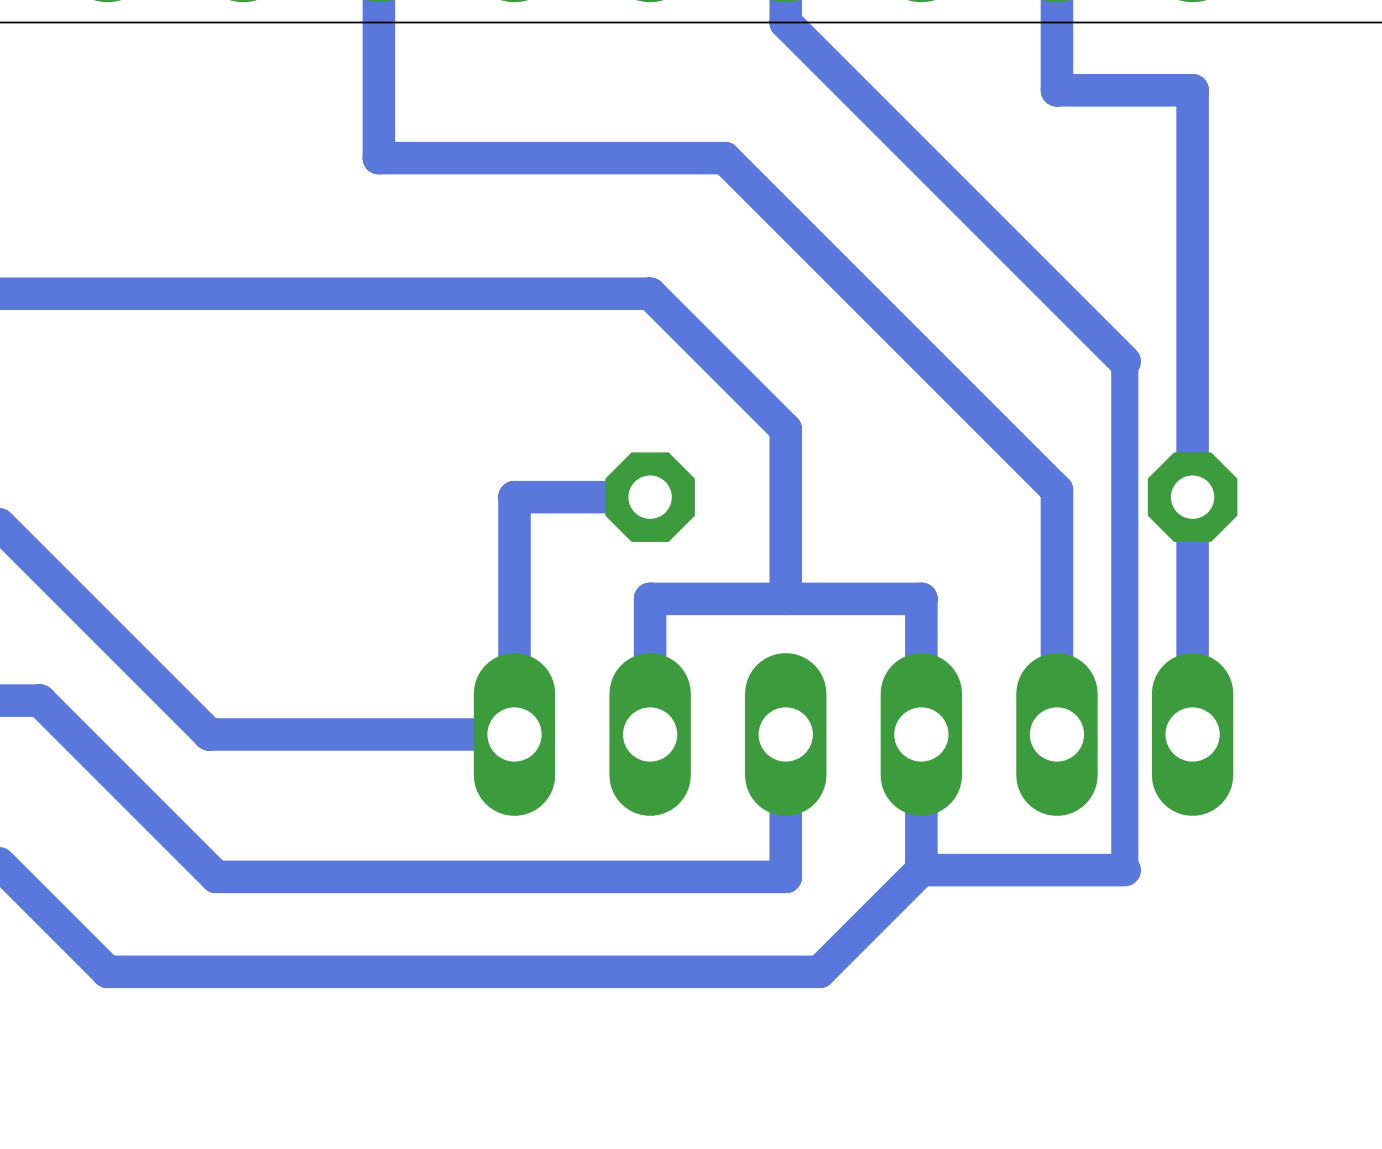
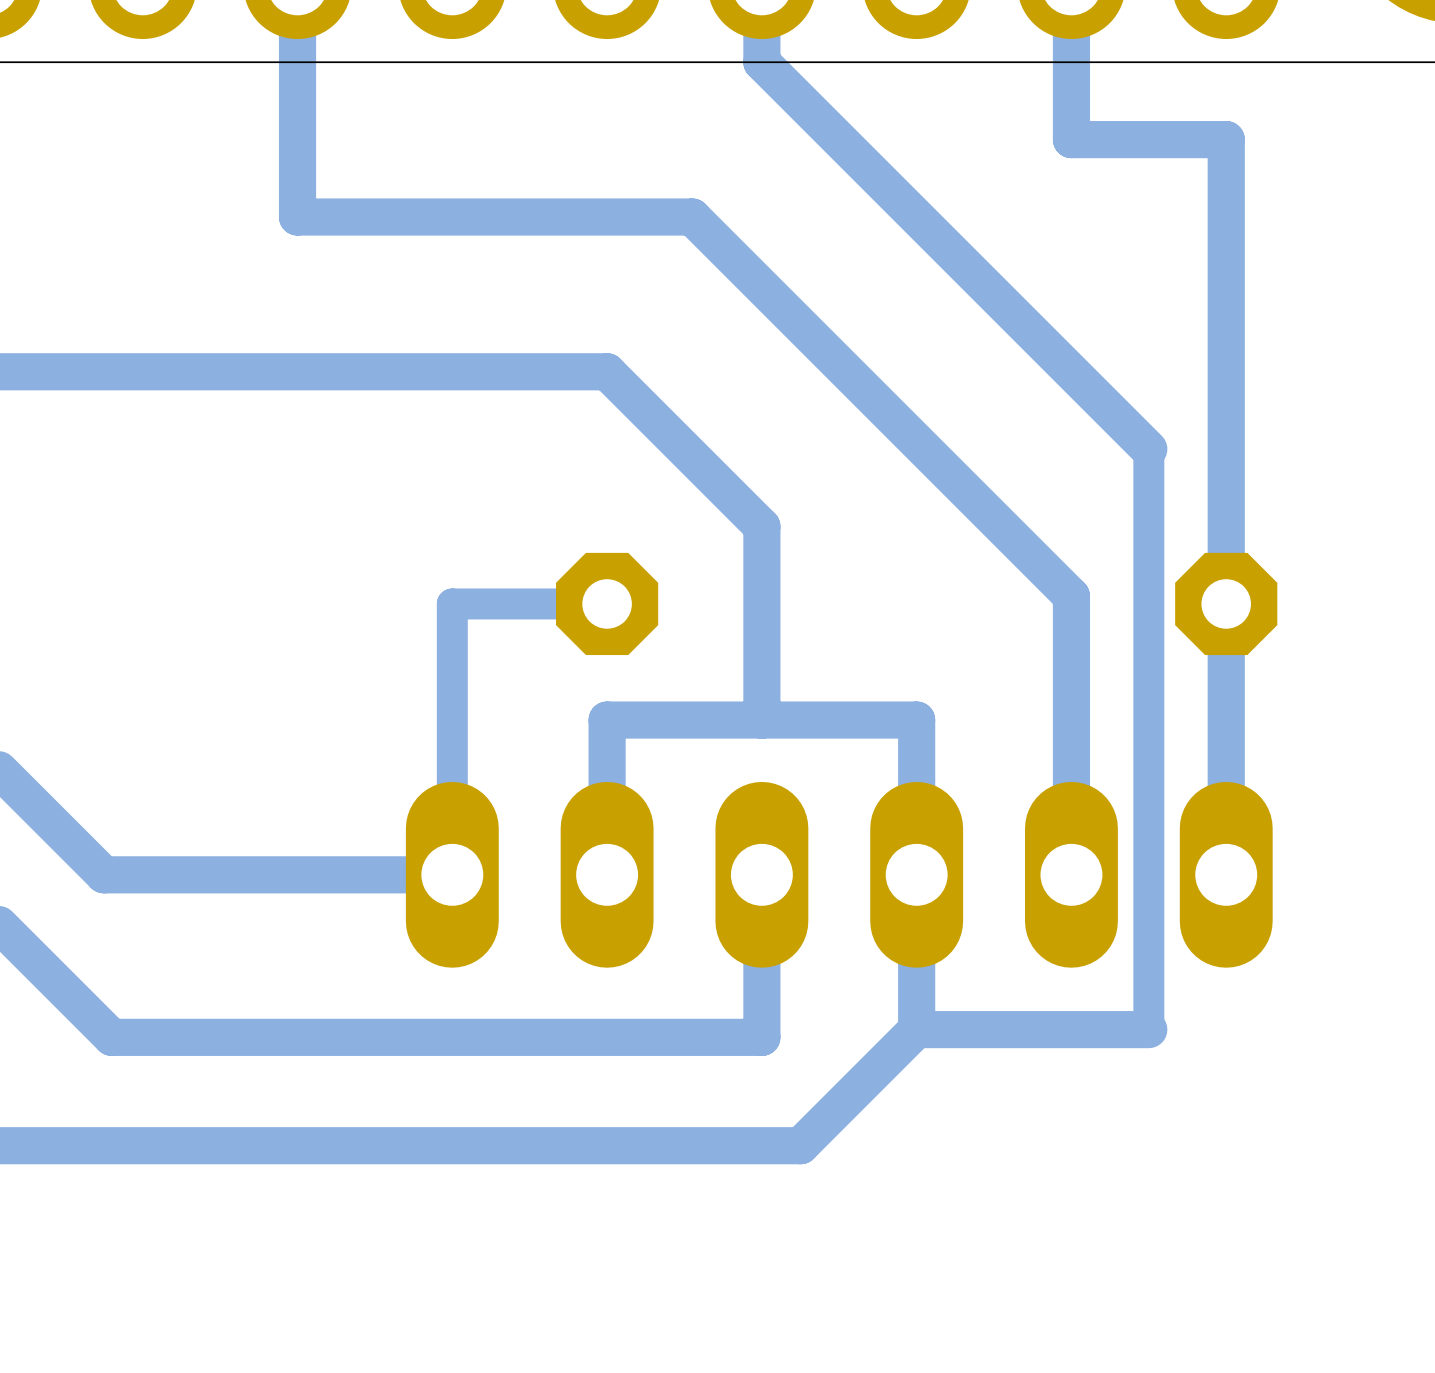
track width: thick (650, 497) (514, 497) (514, 734) -> thin (607, 603) (452, 603) (452, 874)

